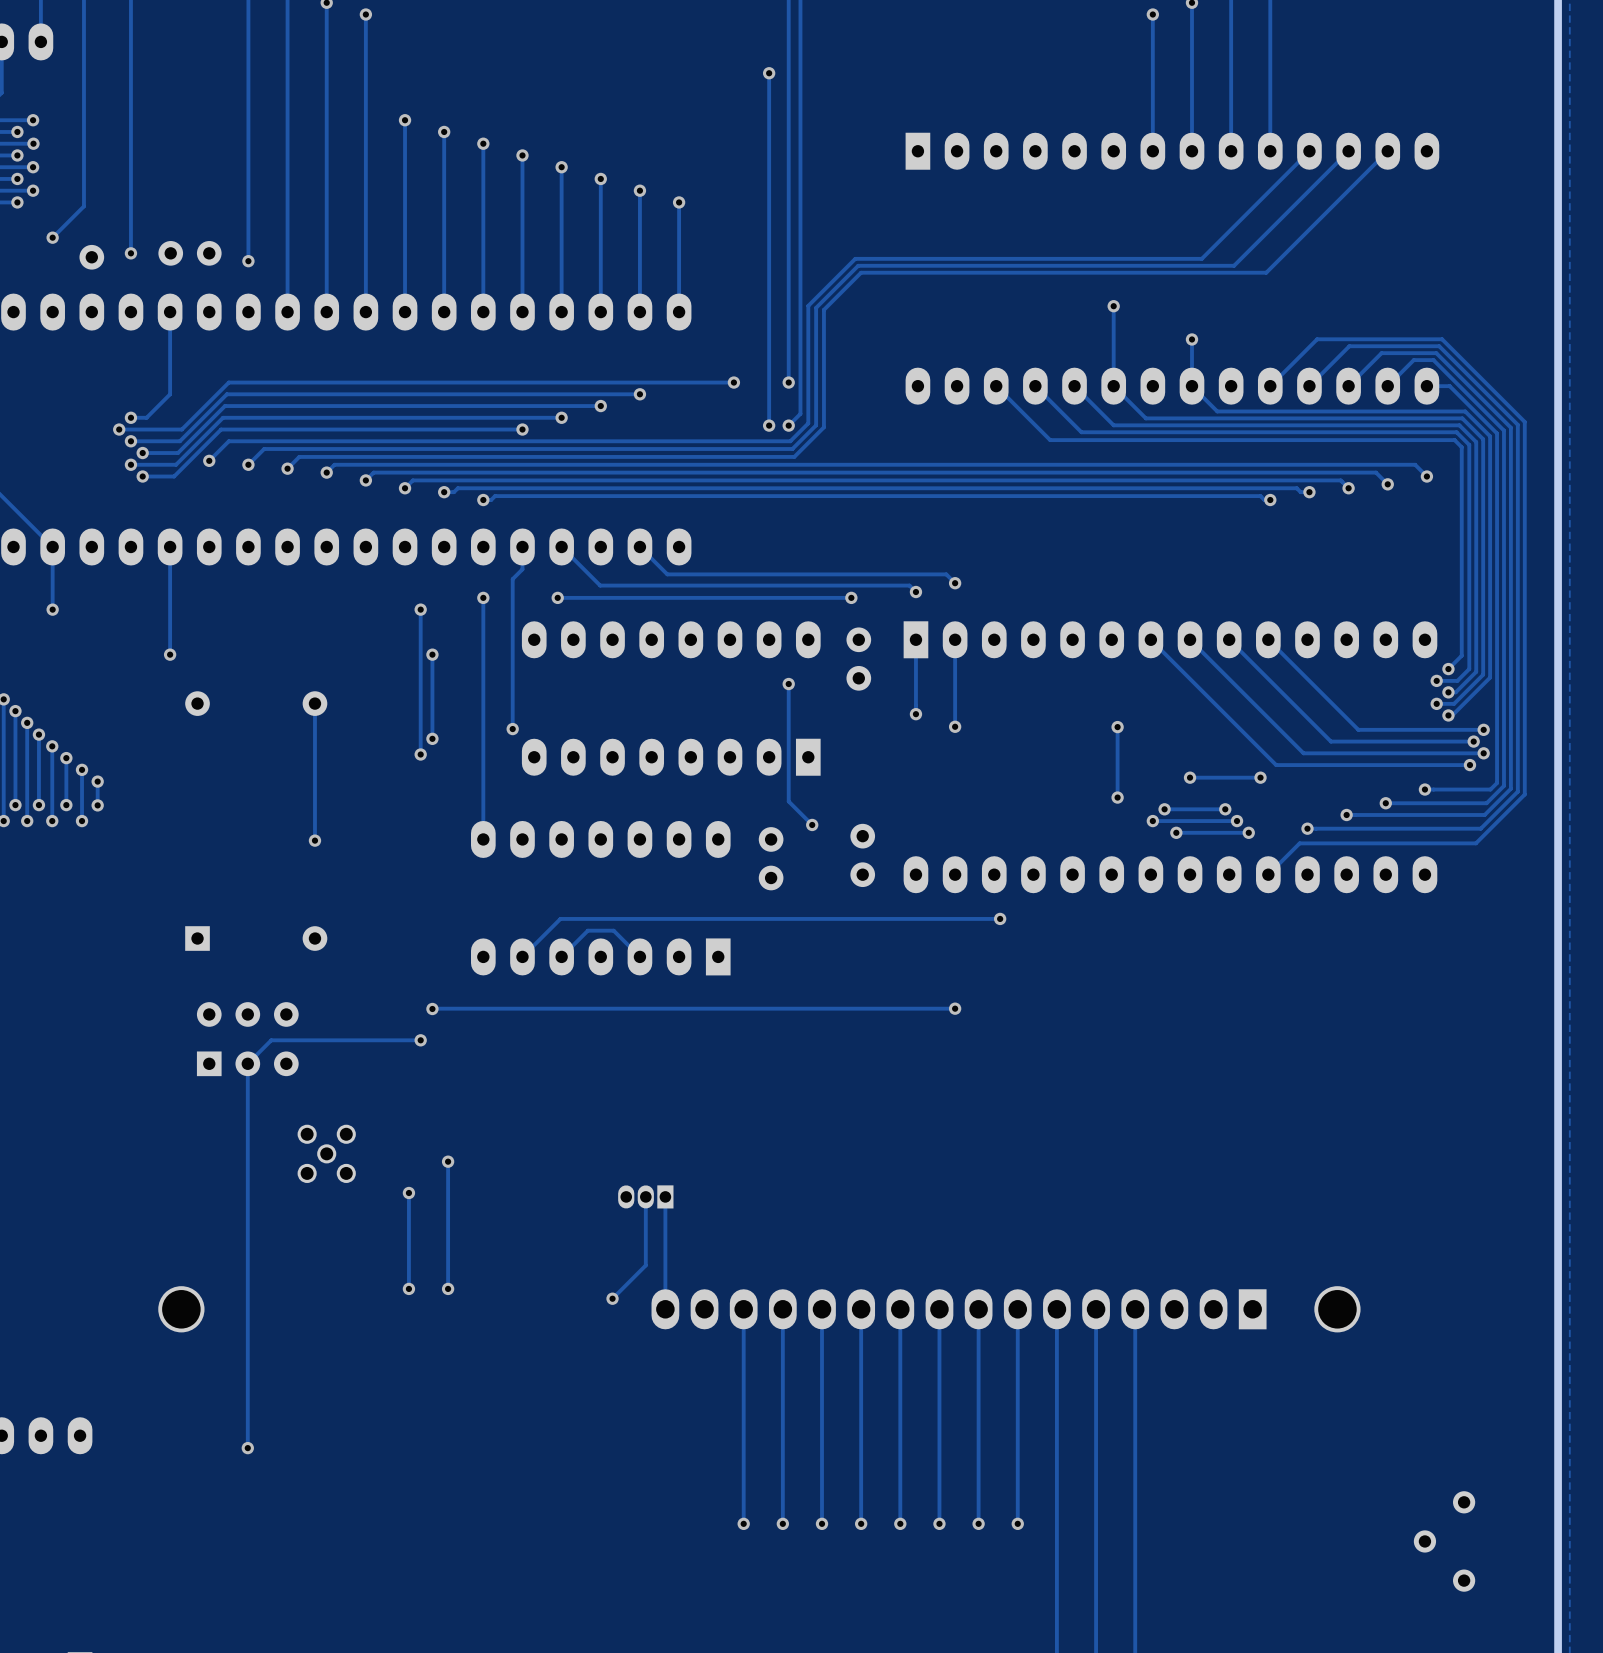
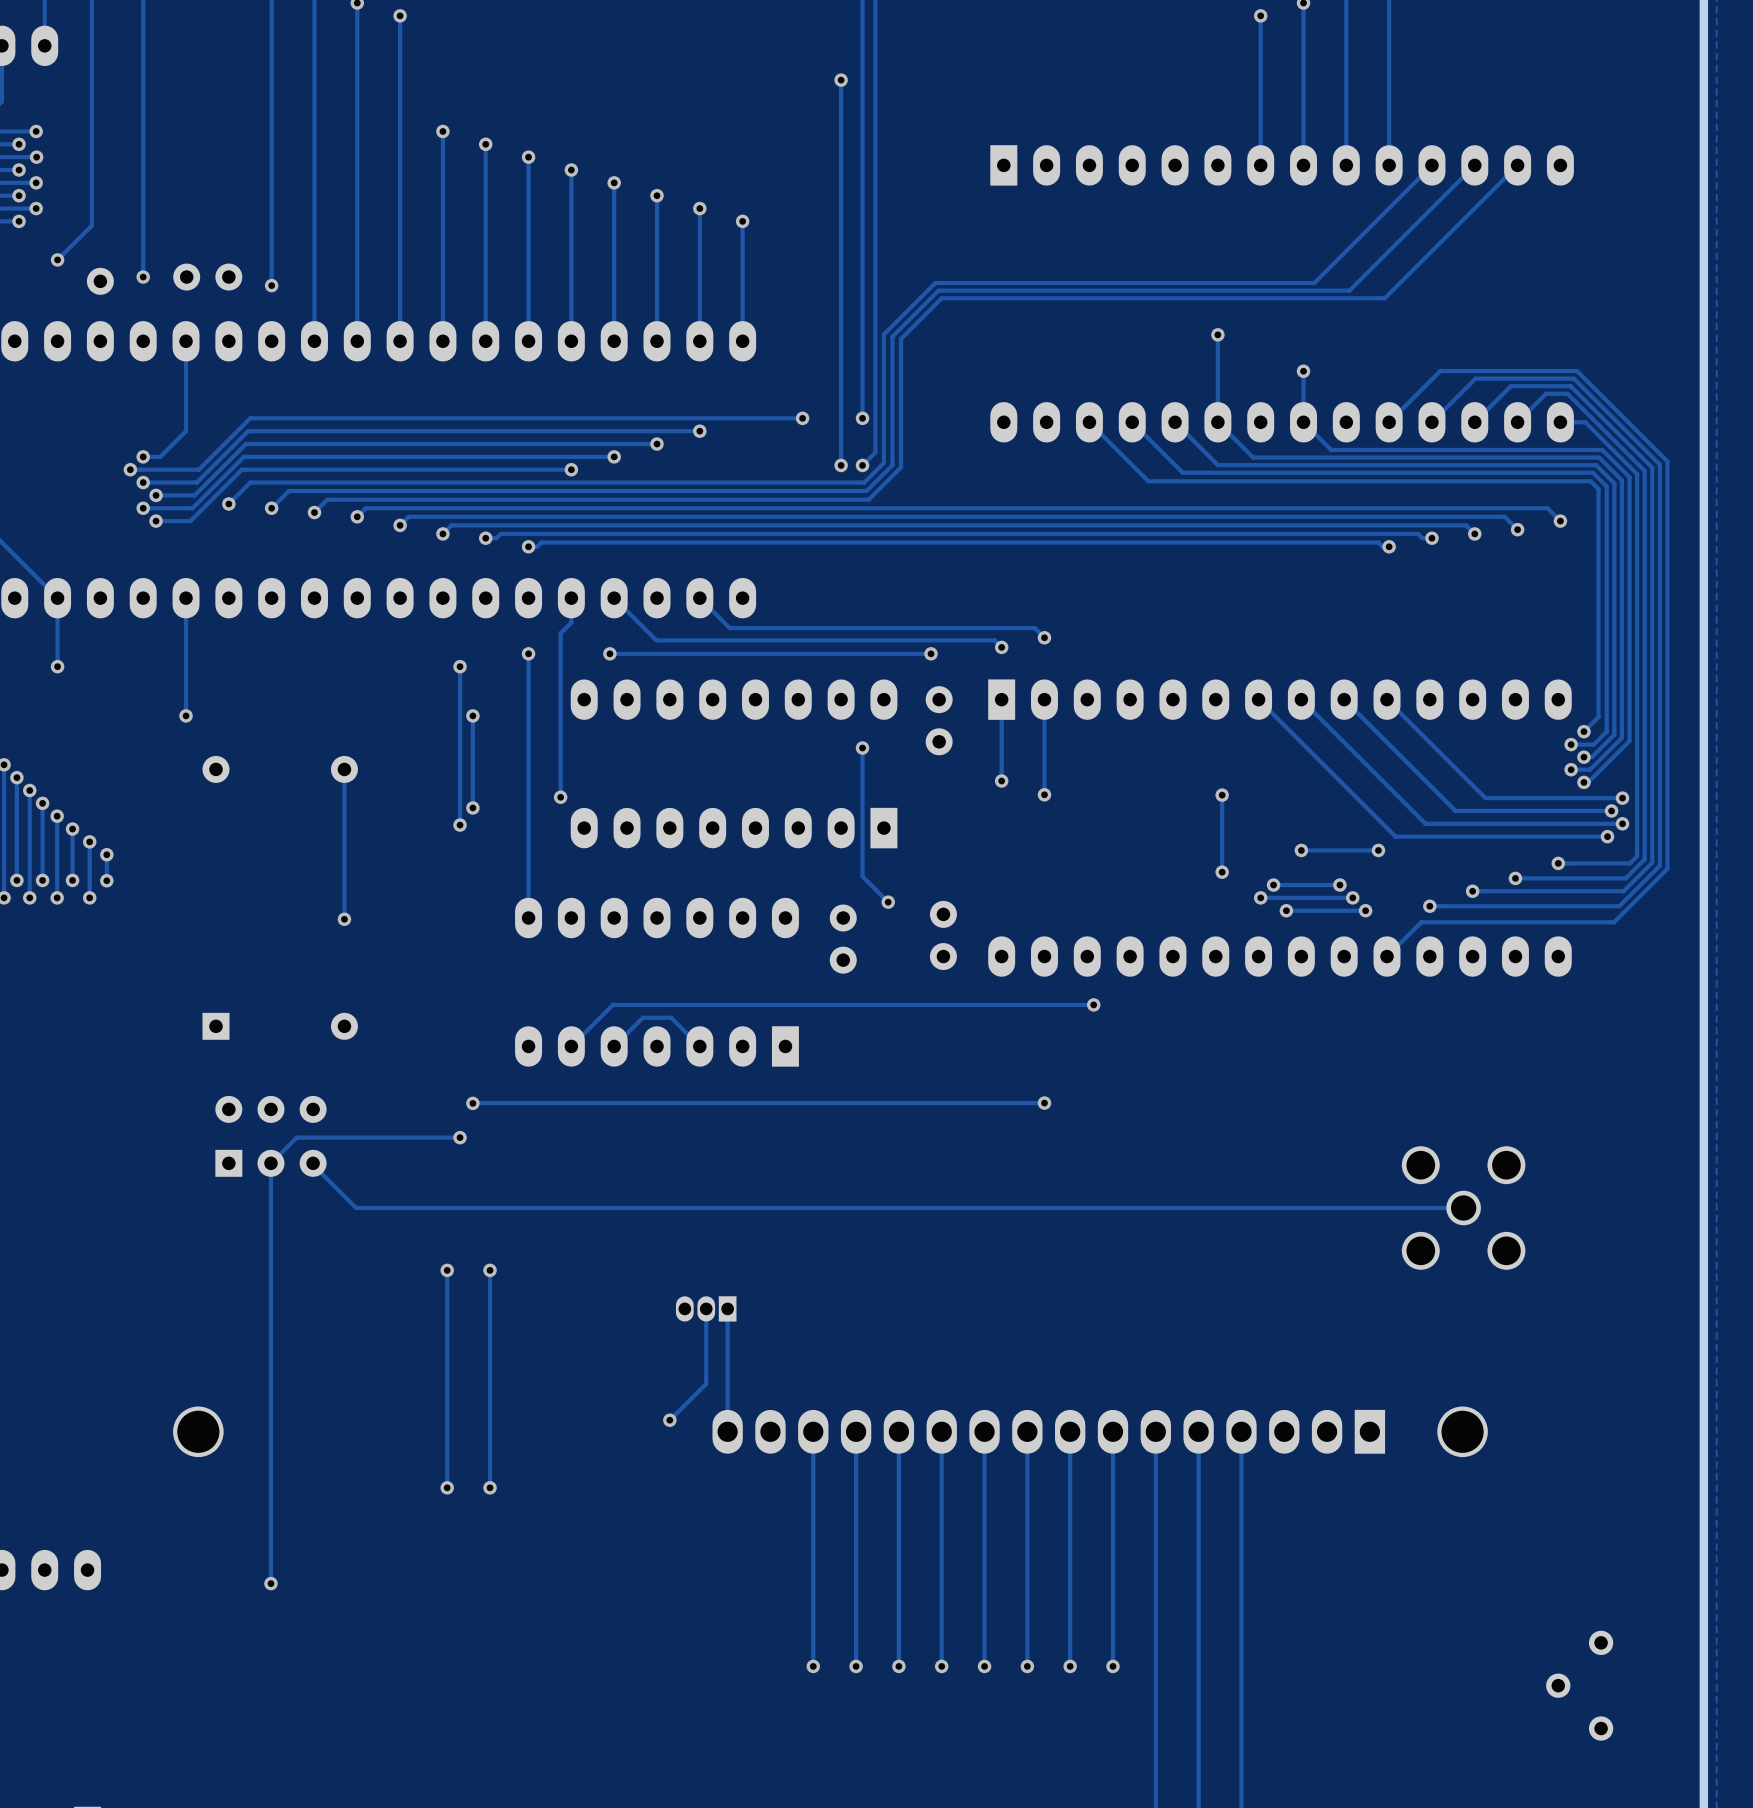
track: none -> (314, 1165) (356, 1208) (1463, 1208)
part: none -> (1463, 1208)
part: (326, 1153) -> none
track: none -> (447, 1270) (447, 1304)
via position: (408, 1193) -> (447, 1270)
track: none -> (447, 1409) (447, 1487)
via: (408, 1288) -> none
track: none -> (490, 1409) (490, 1487)
via: (448, 1288) -> none
via: none -> (447, 1487)
via: none -> (490, 1487)

